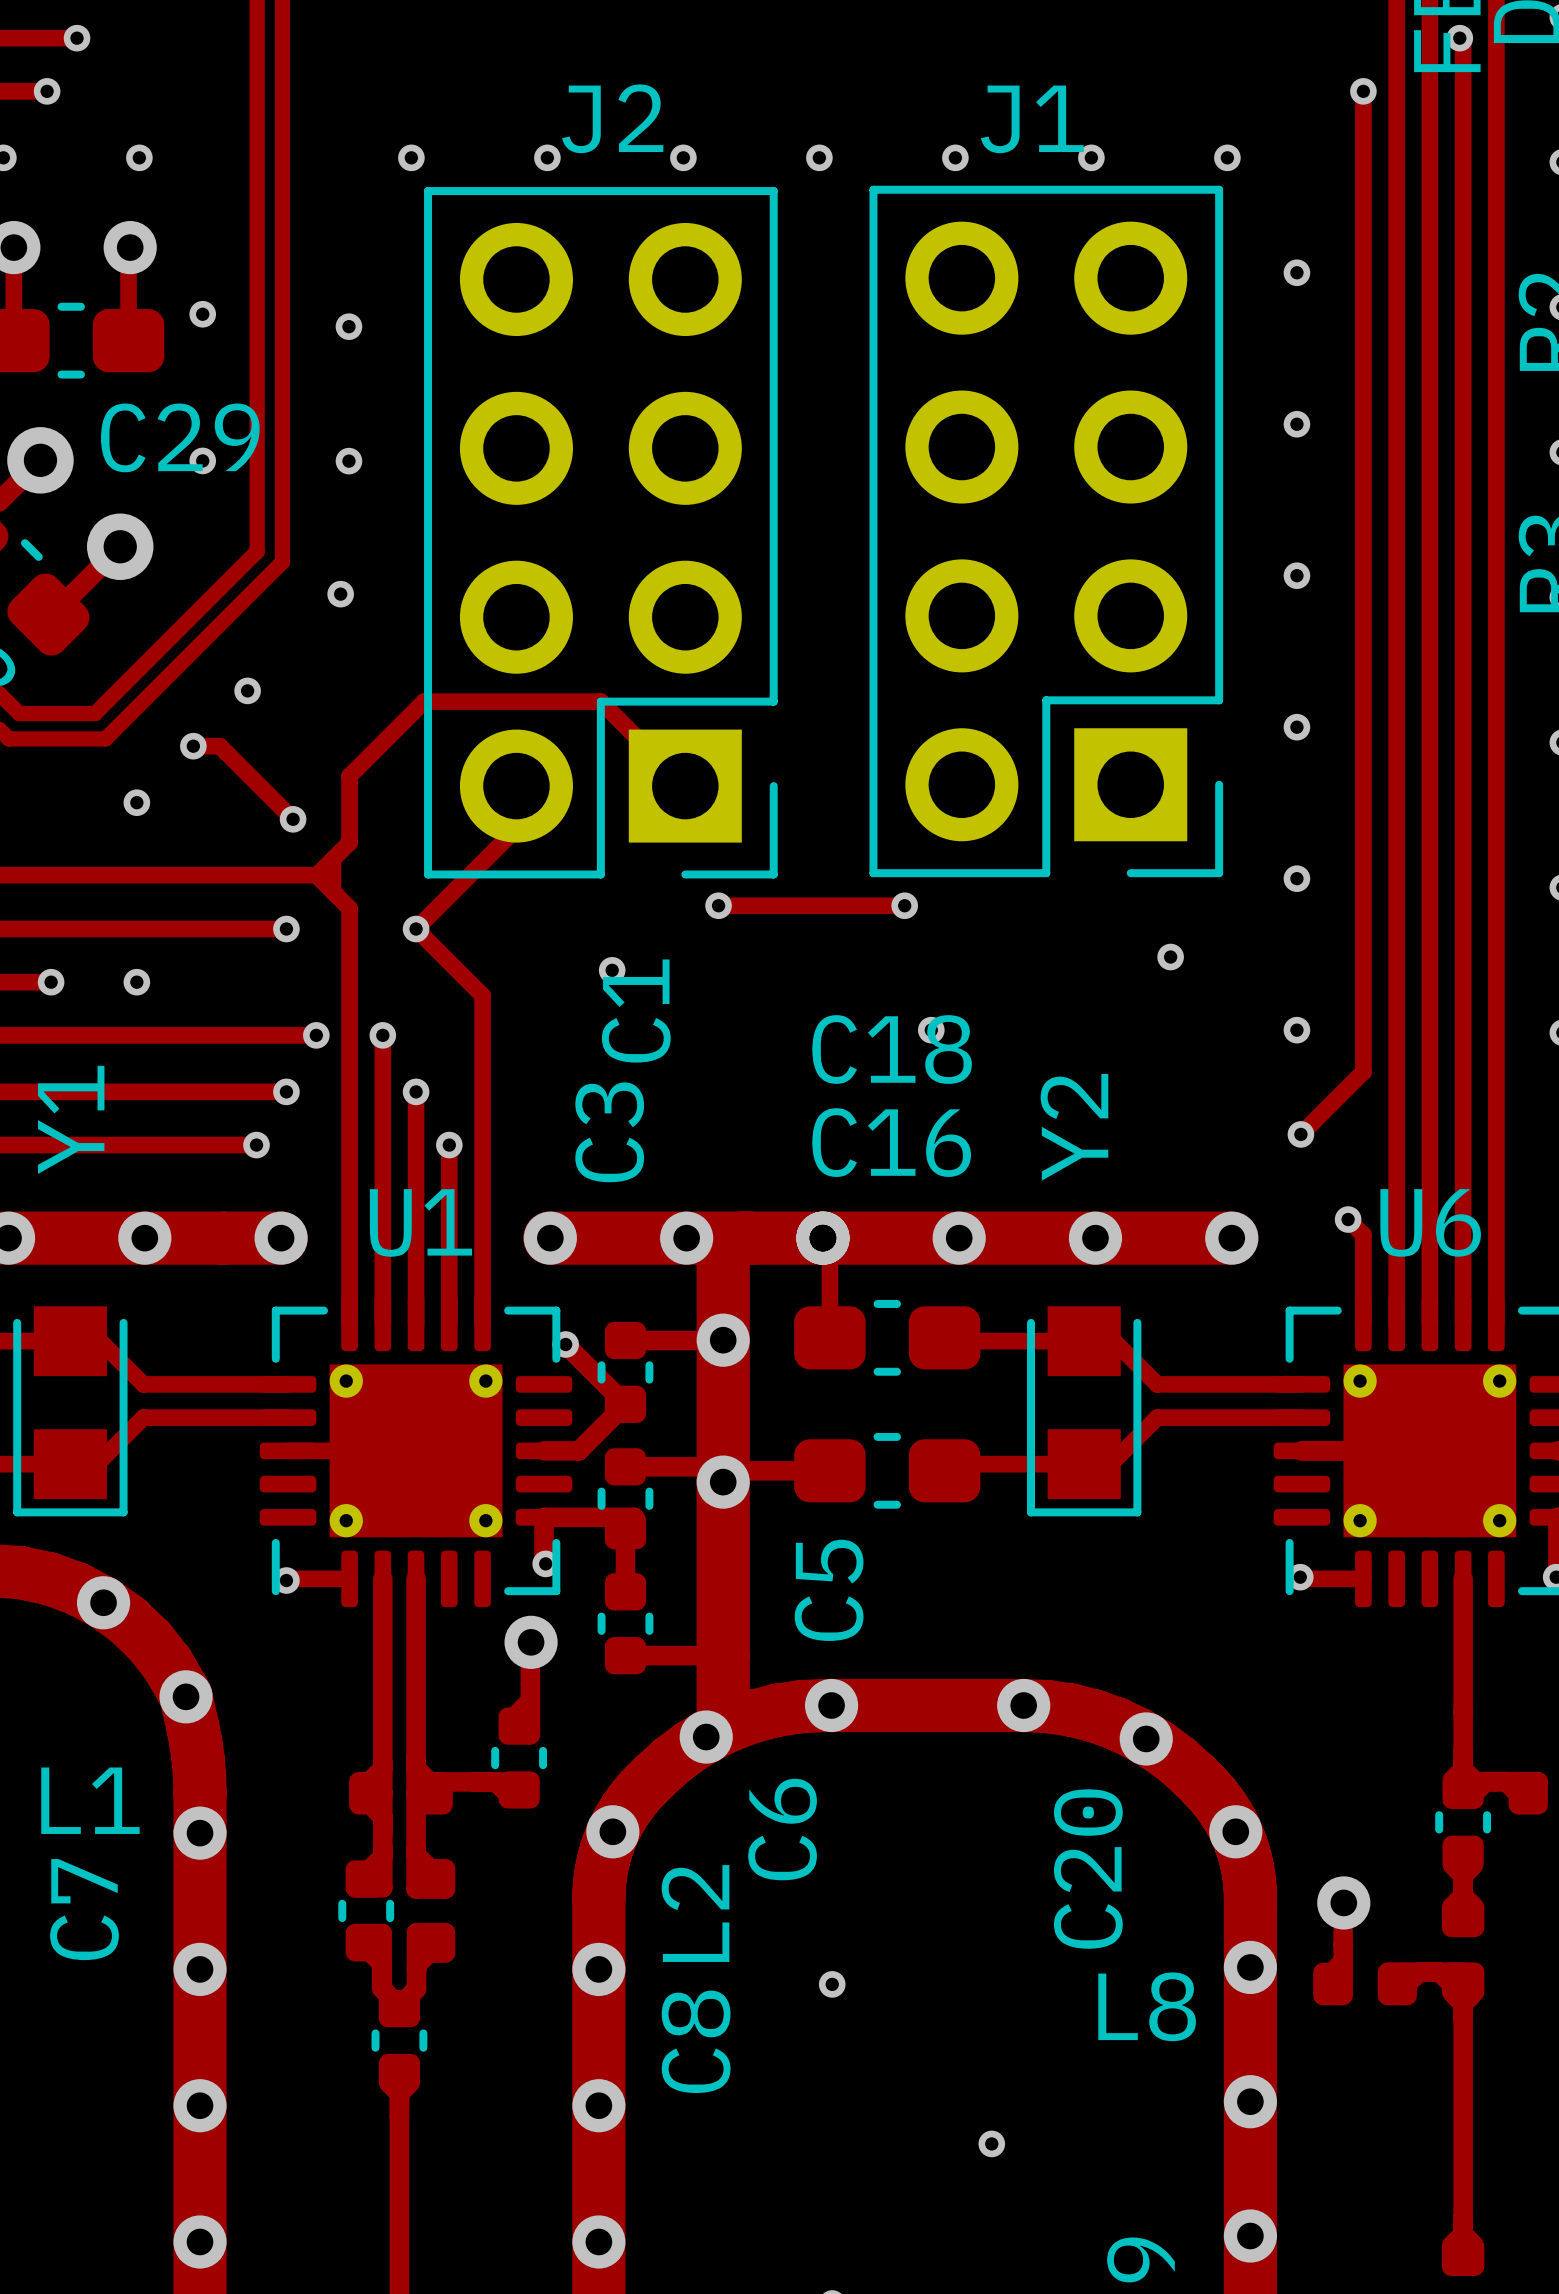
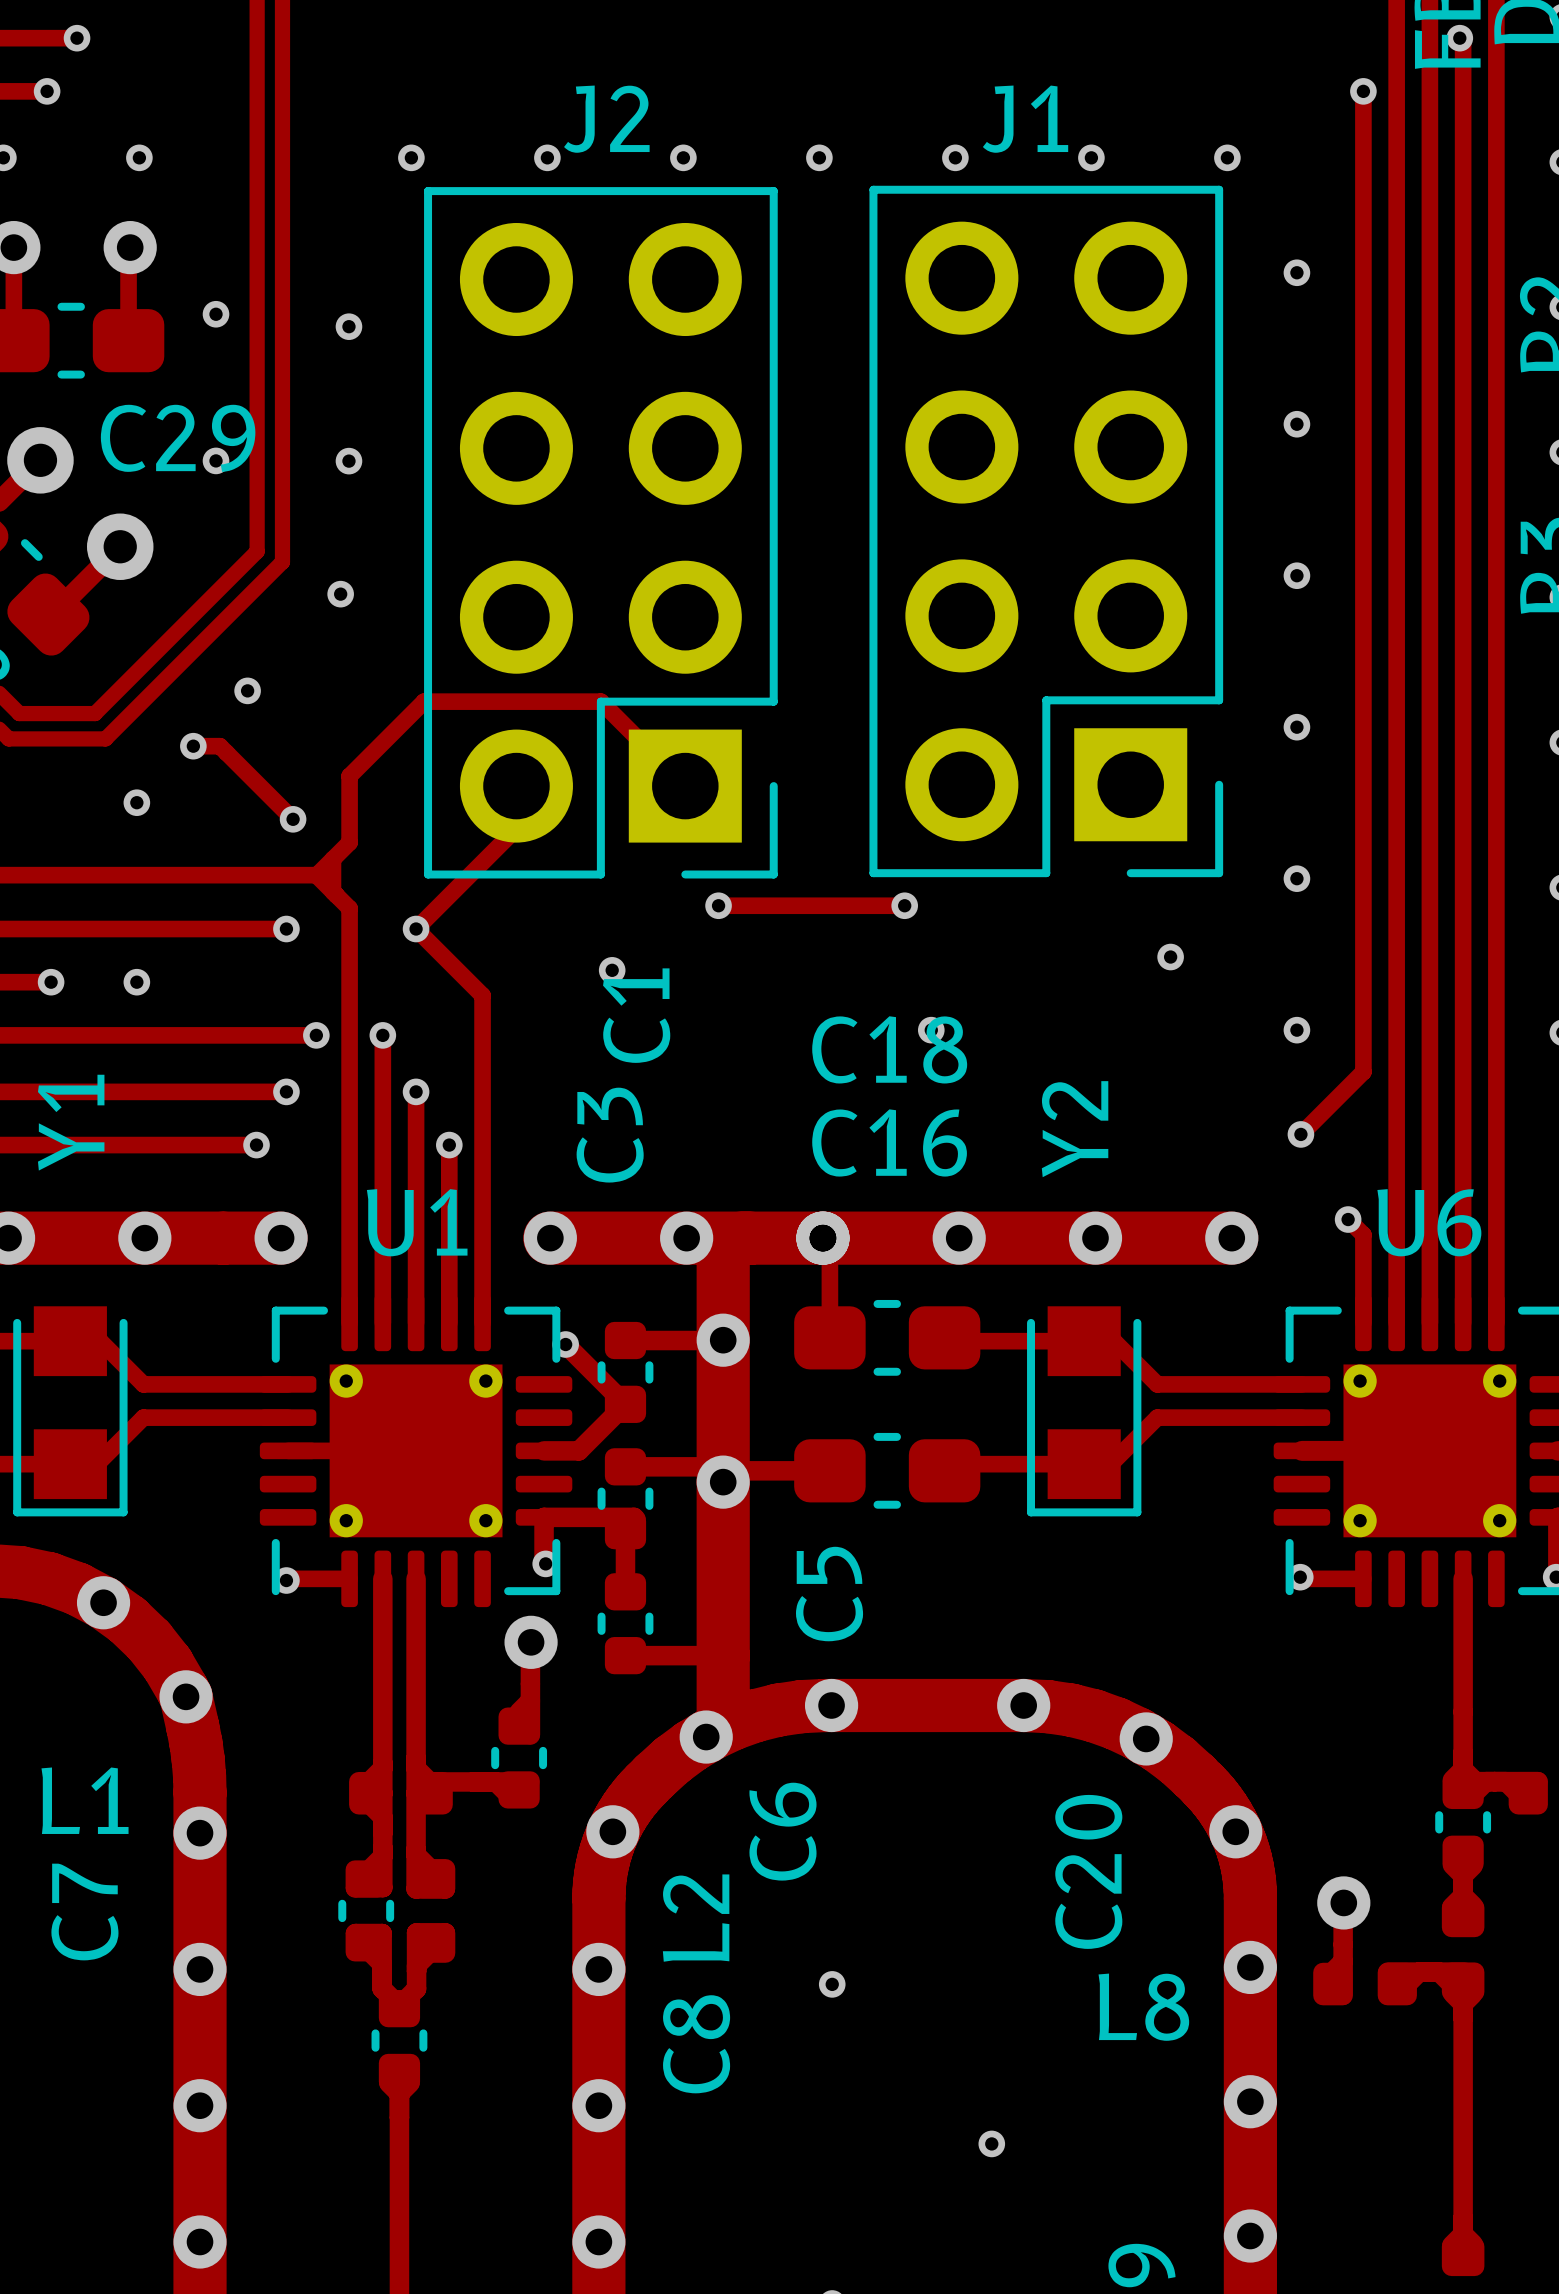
via position: (202, 314) -> (216, 314)
via position: (202, 460) -> (216, 460)

